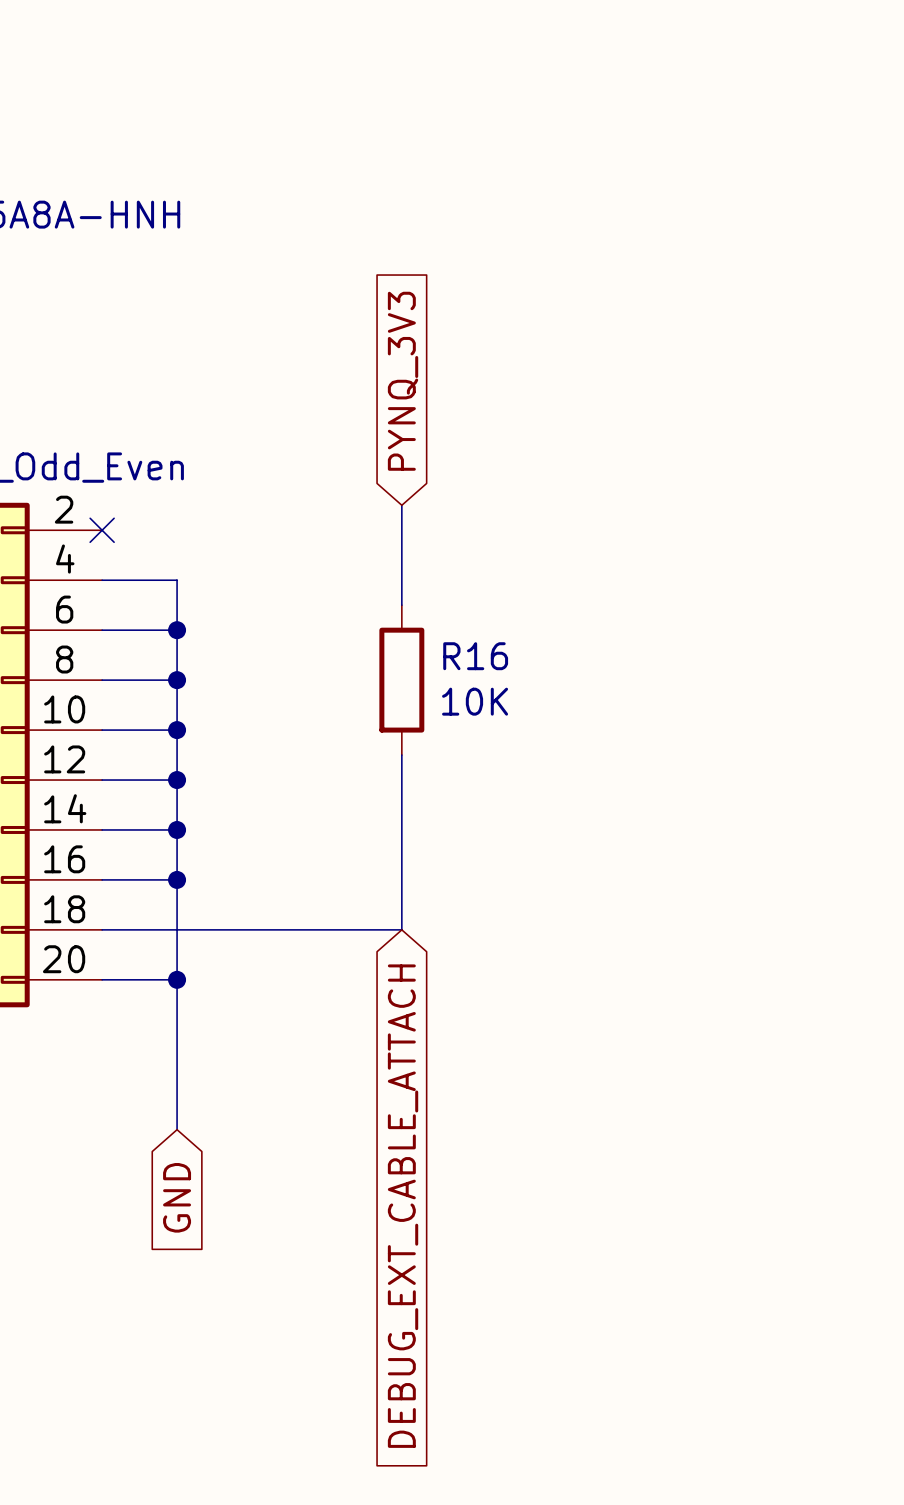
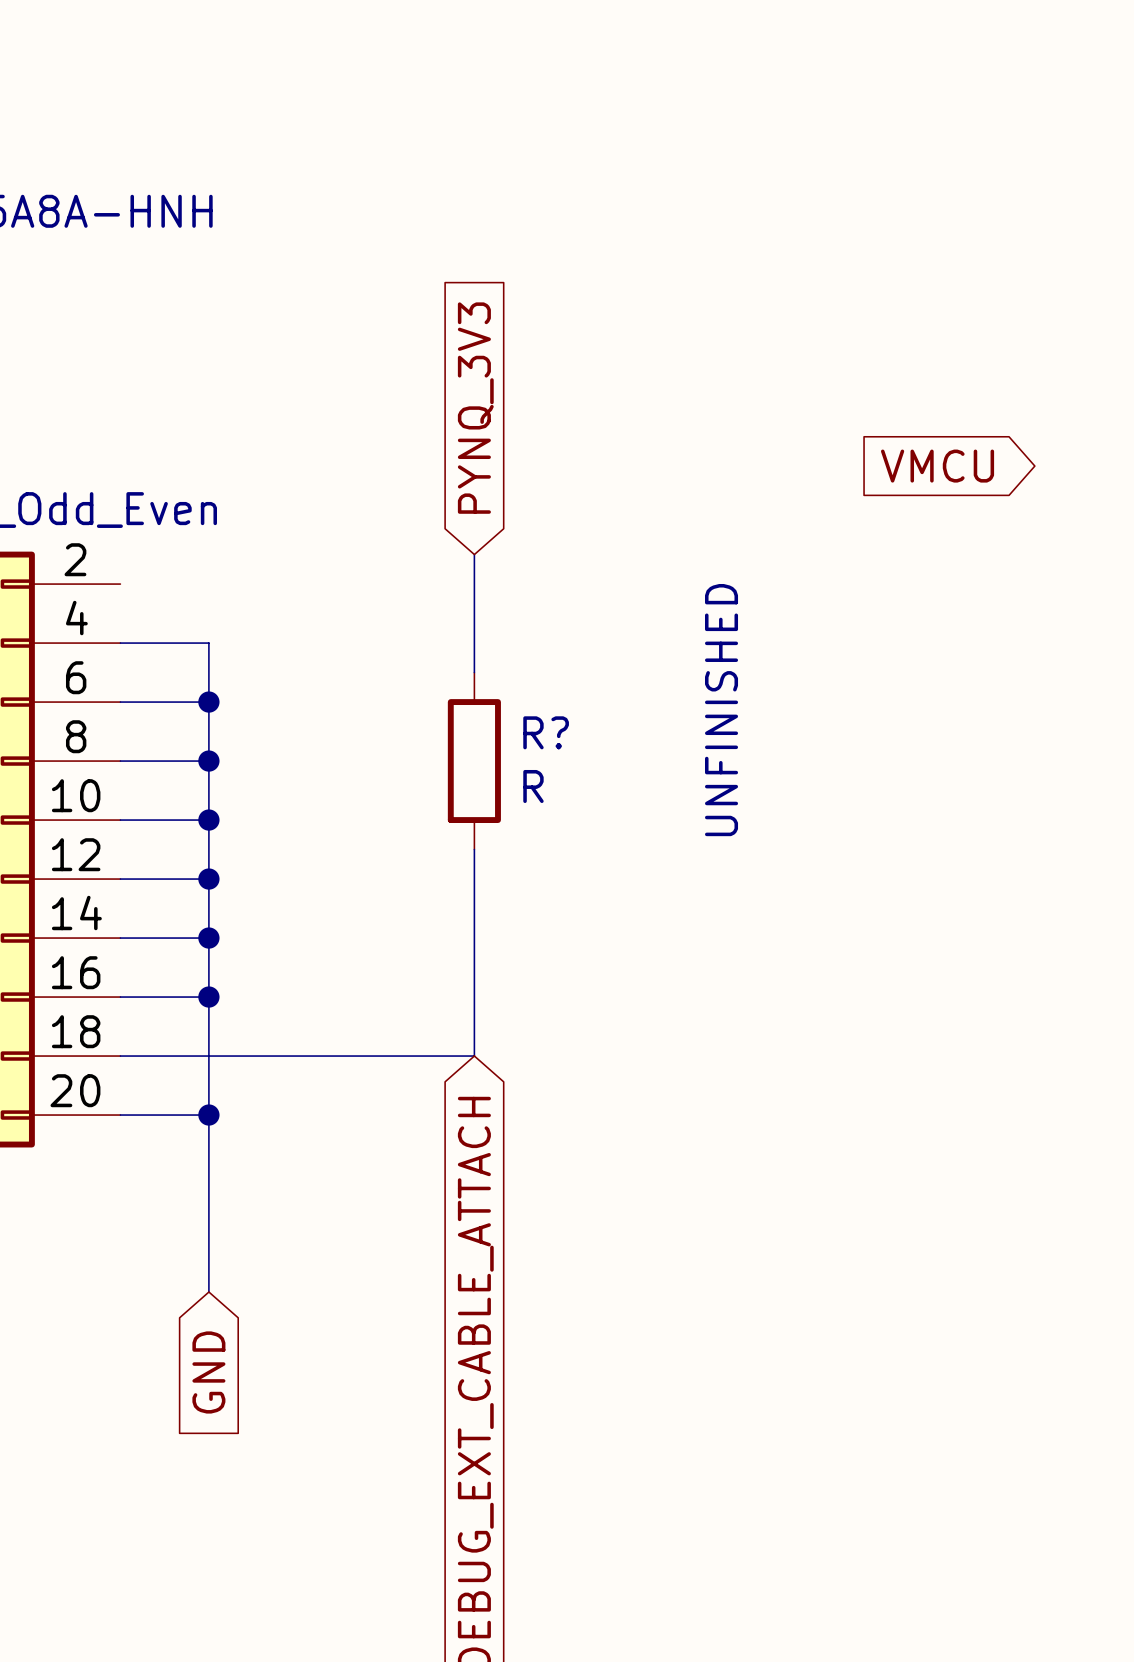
global label: none -> VMCU (937, 466)
no-connect mark: (102, 530) -> none
text: none -> UNFINISHED (721, 710)
R16 name: R16 (475, 656) -> R? (546, 732)
R16 value: 10K (475, 701) -> R (533, 786)

